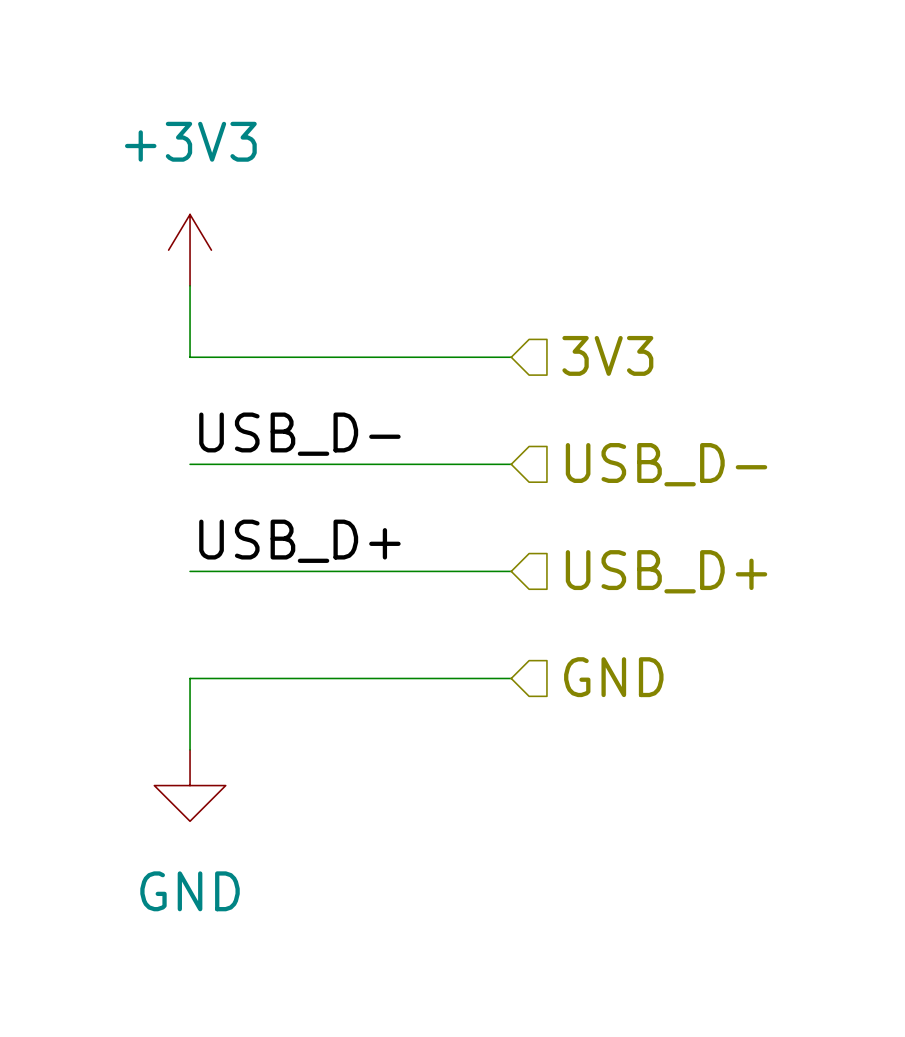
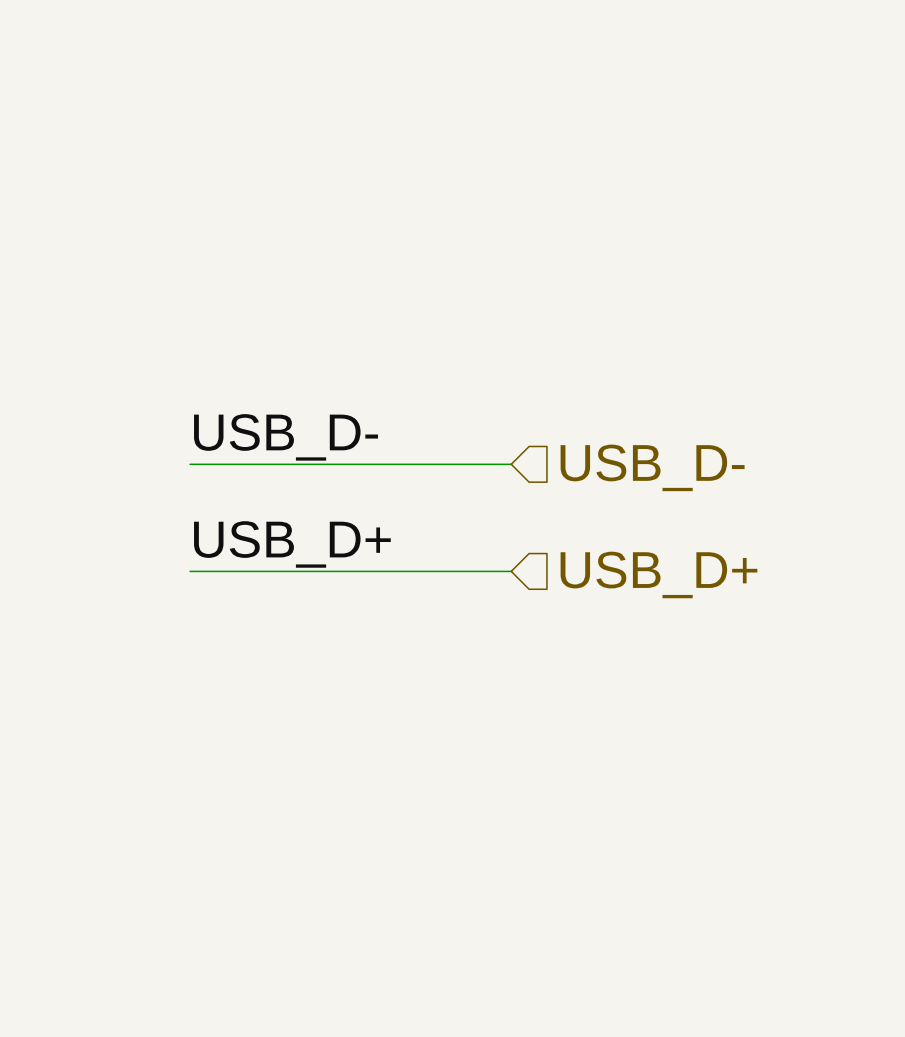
power symbol: +3V3 (190, 250) -> none
wire: (190, 285) (190, 357) (511, 357) -> none
hierarchical label: 3V3 (607, 355) -> none
hierarchical label: GND (613, 677) -> none
wire: (511, 678) (190, 678) (190, 749) -> none
power symbol: GND (190, 785) -> none

